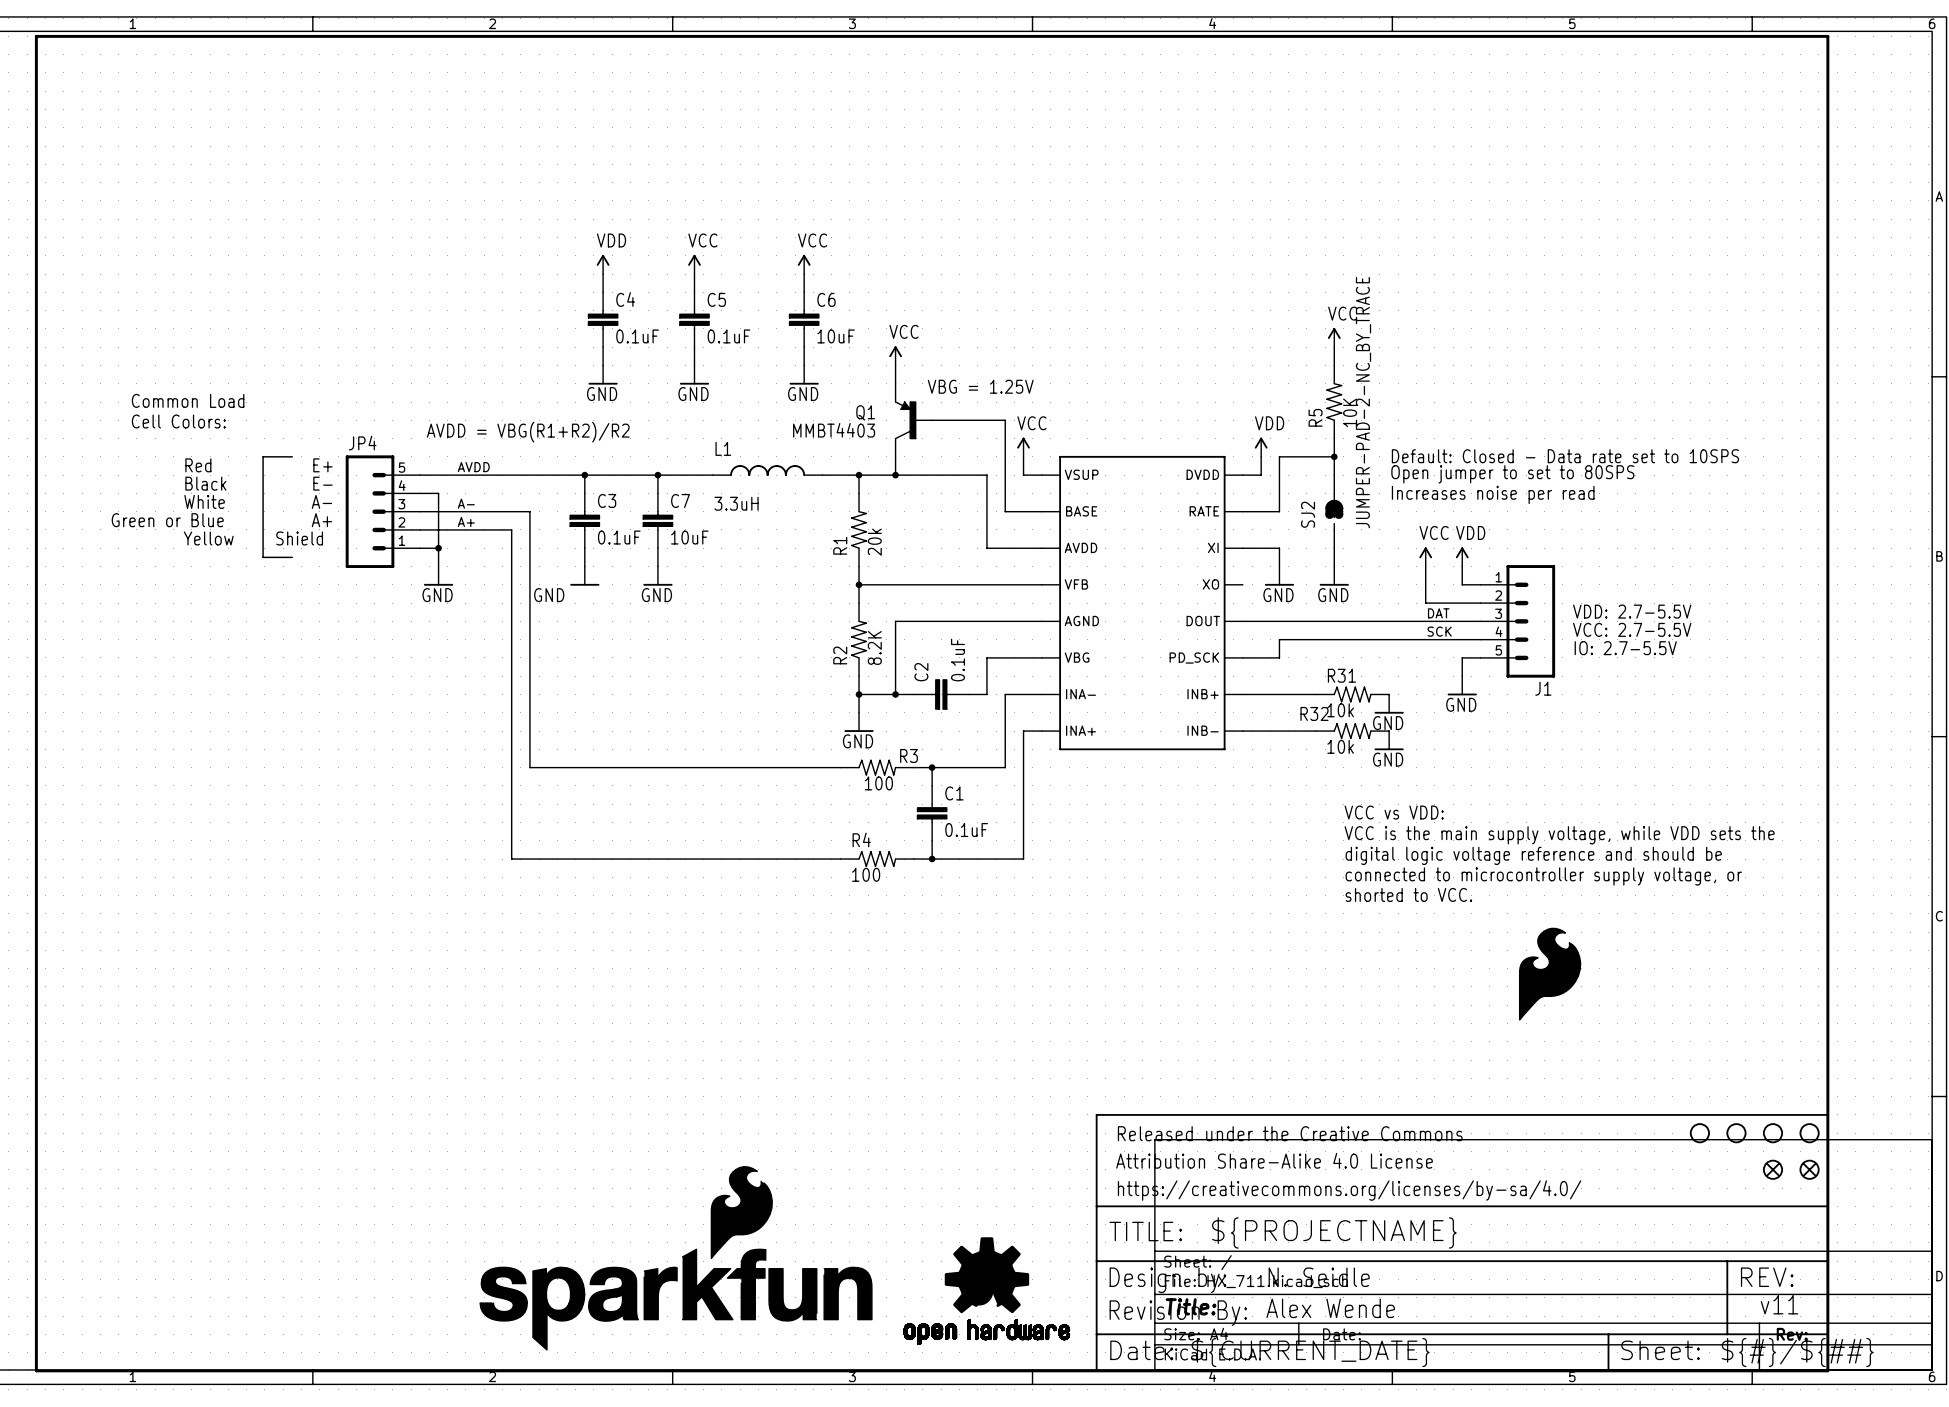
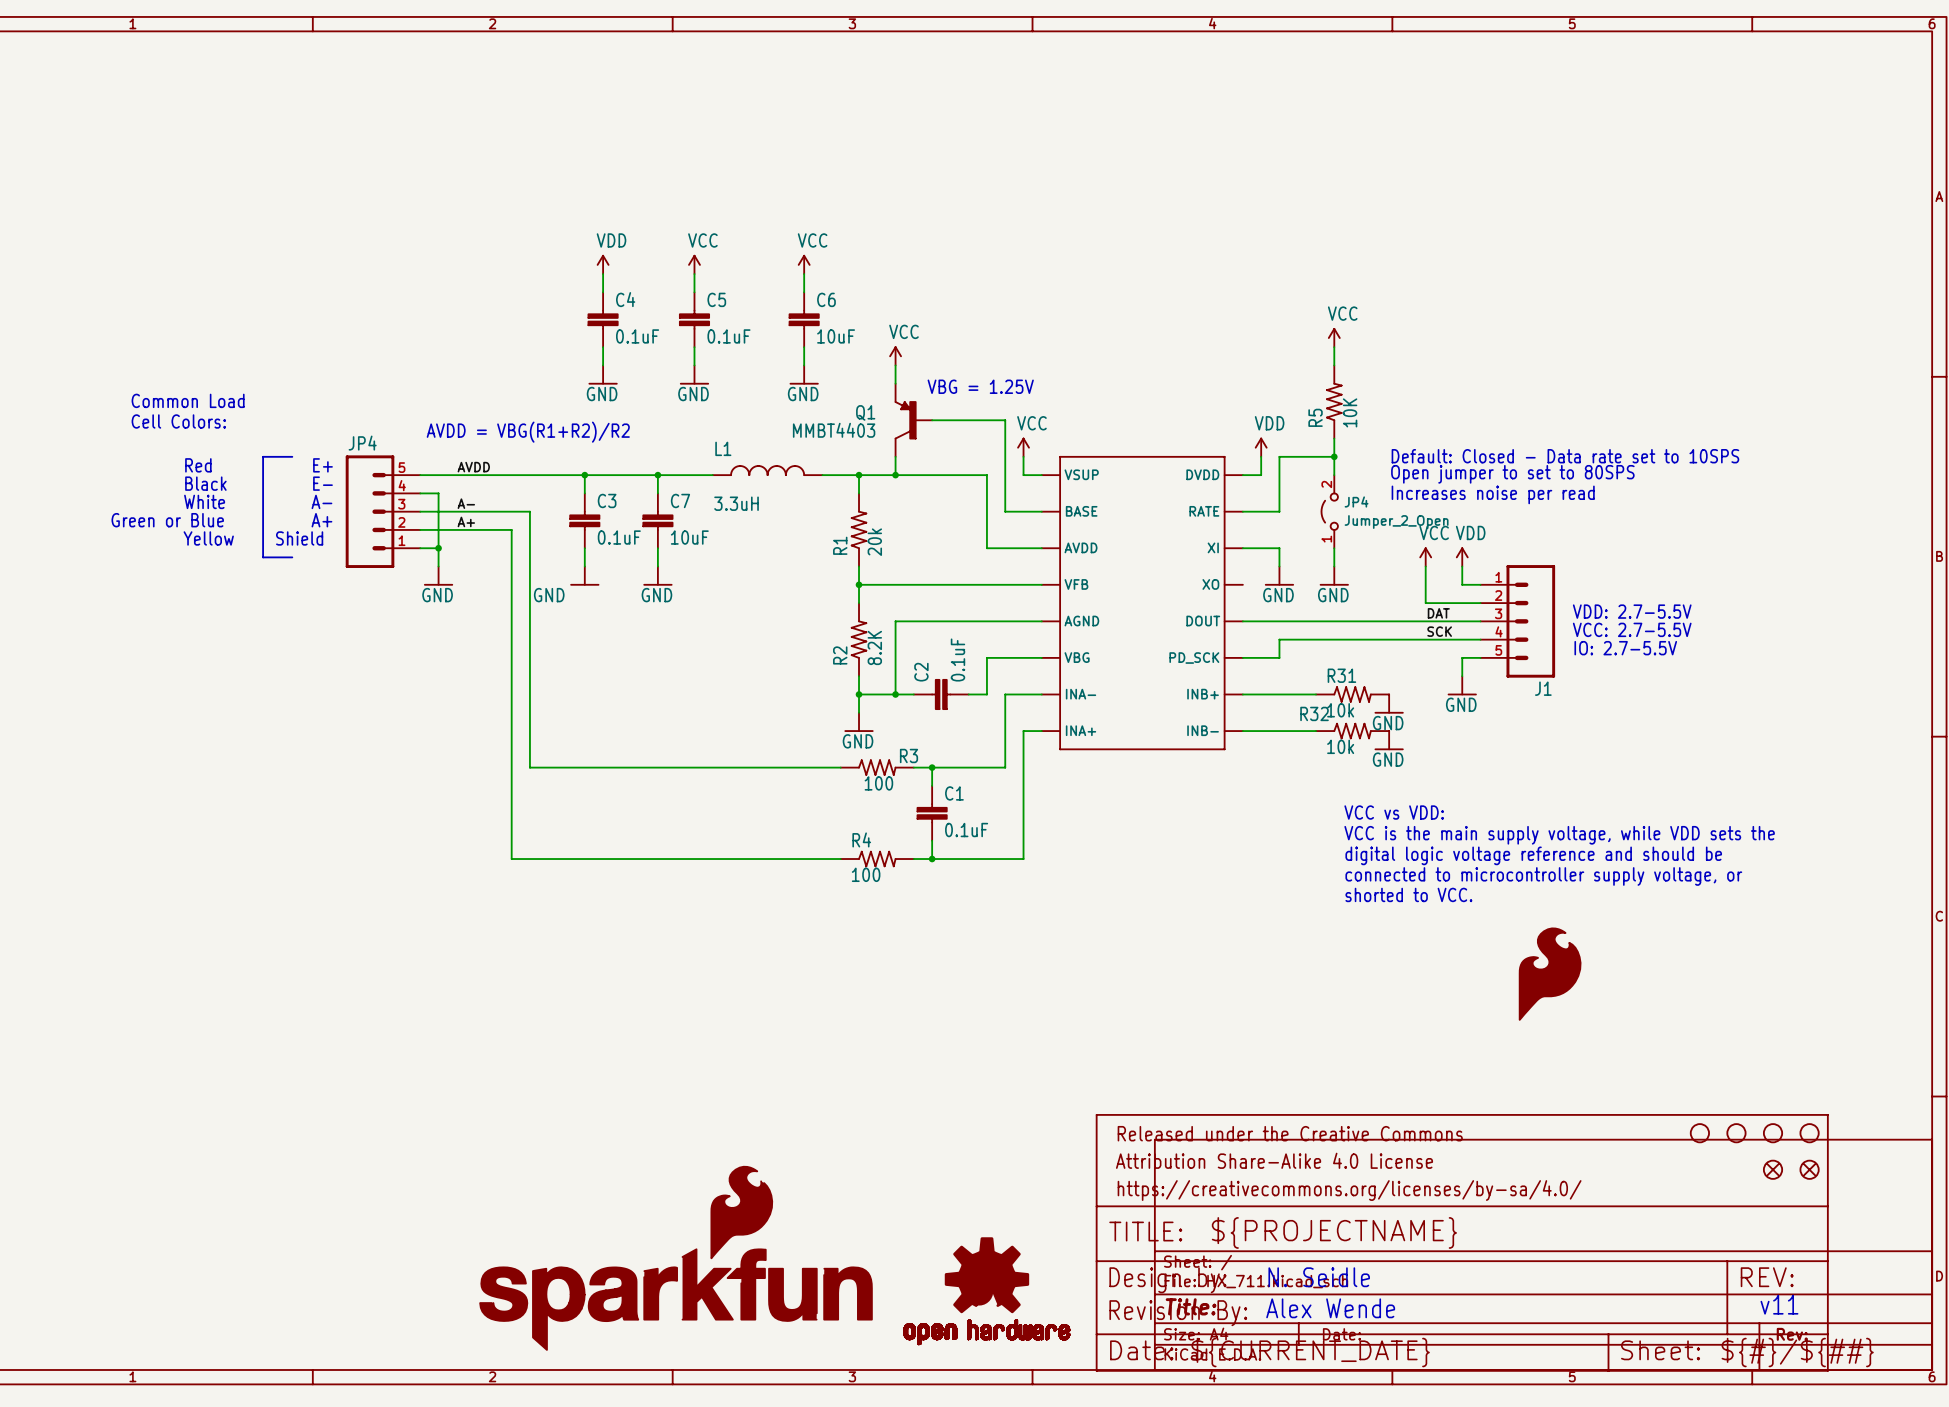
JP4: none -> Jumper_2_Open (1329, 511)
SJ2: JUMPER-PAD-2-NC_BY_TRACE (1334, 511) -> none
part: (932, 703) -> none

